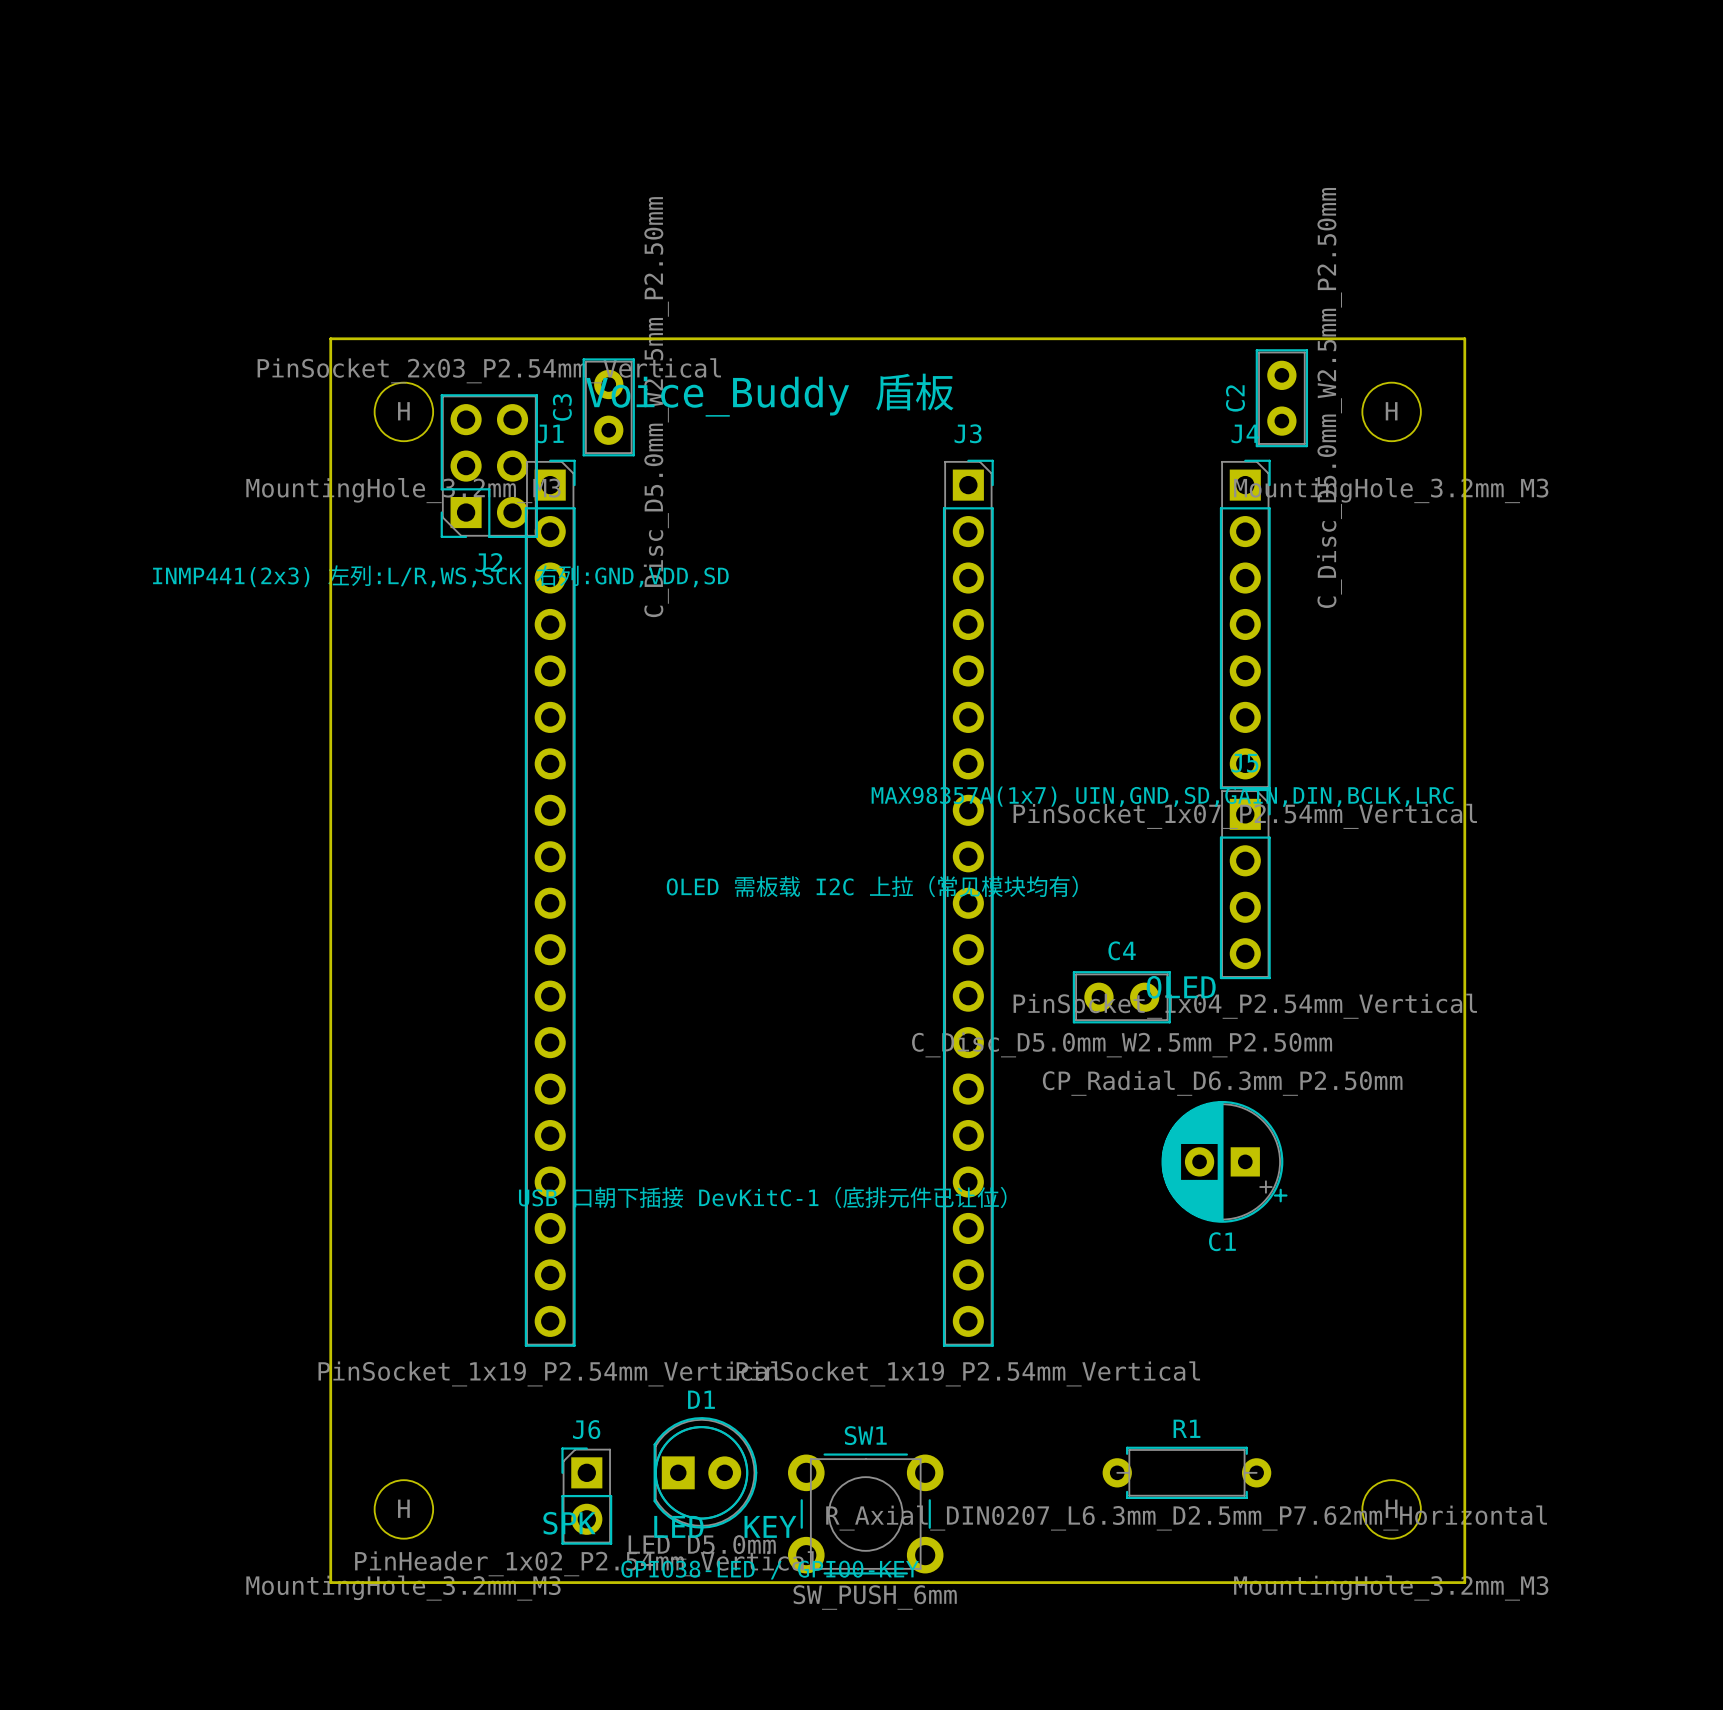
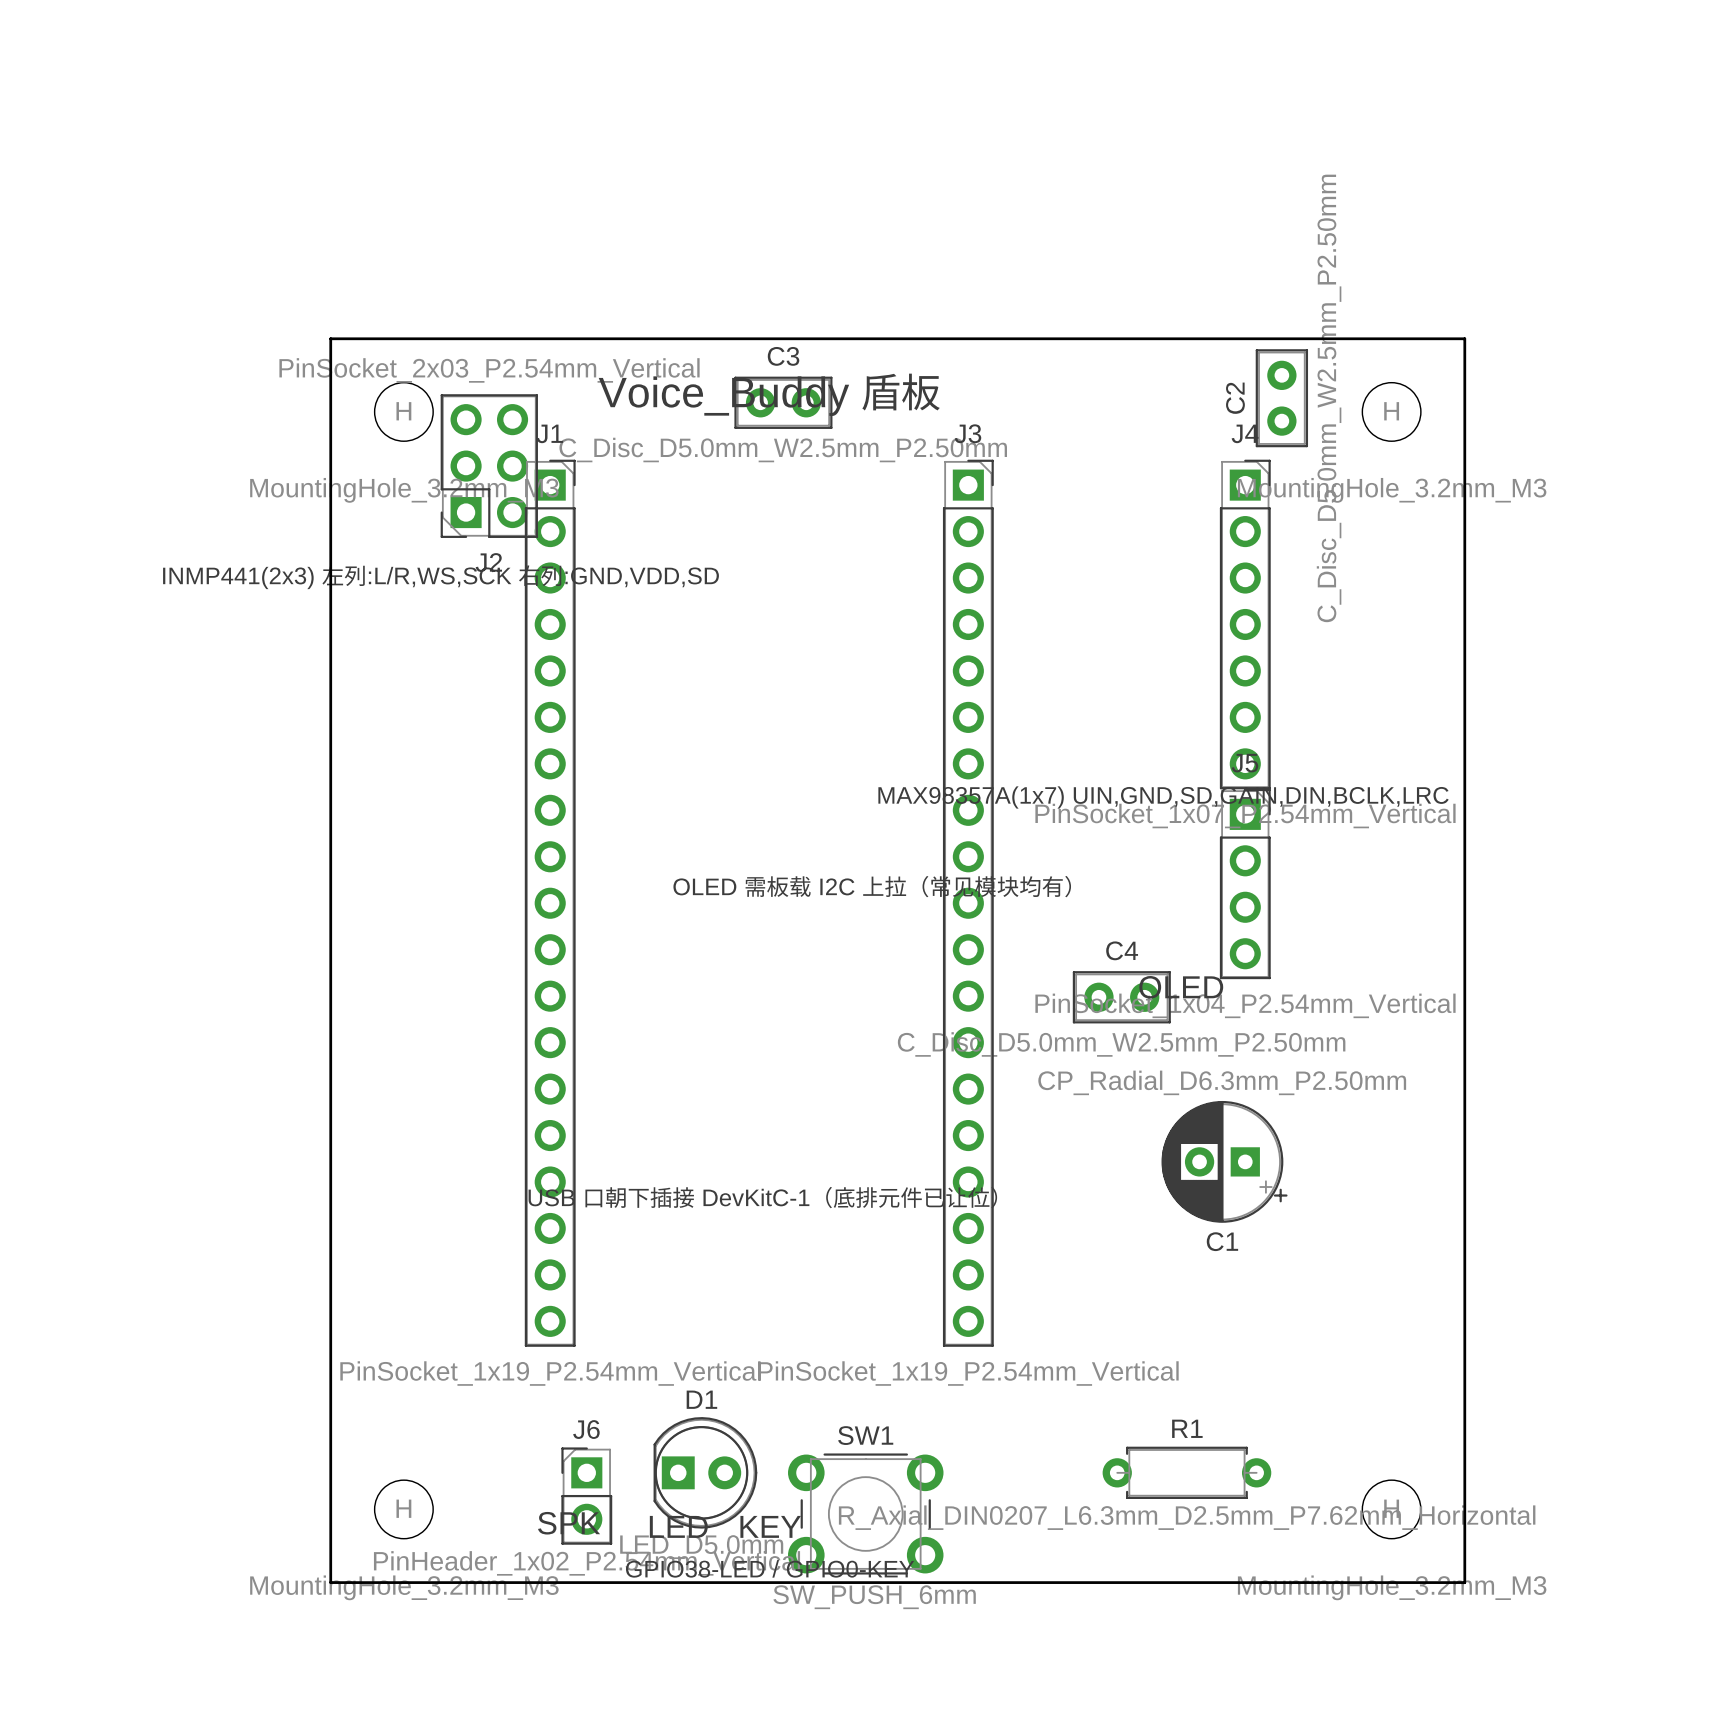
C3 rotation: 0° (608, 407) -> 90° clockwise (783, 402)
C3 position: (608, 407) -> (783, 402)

